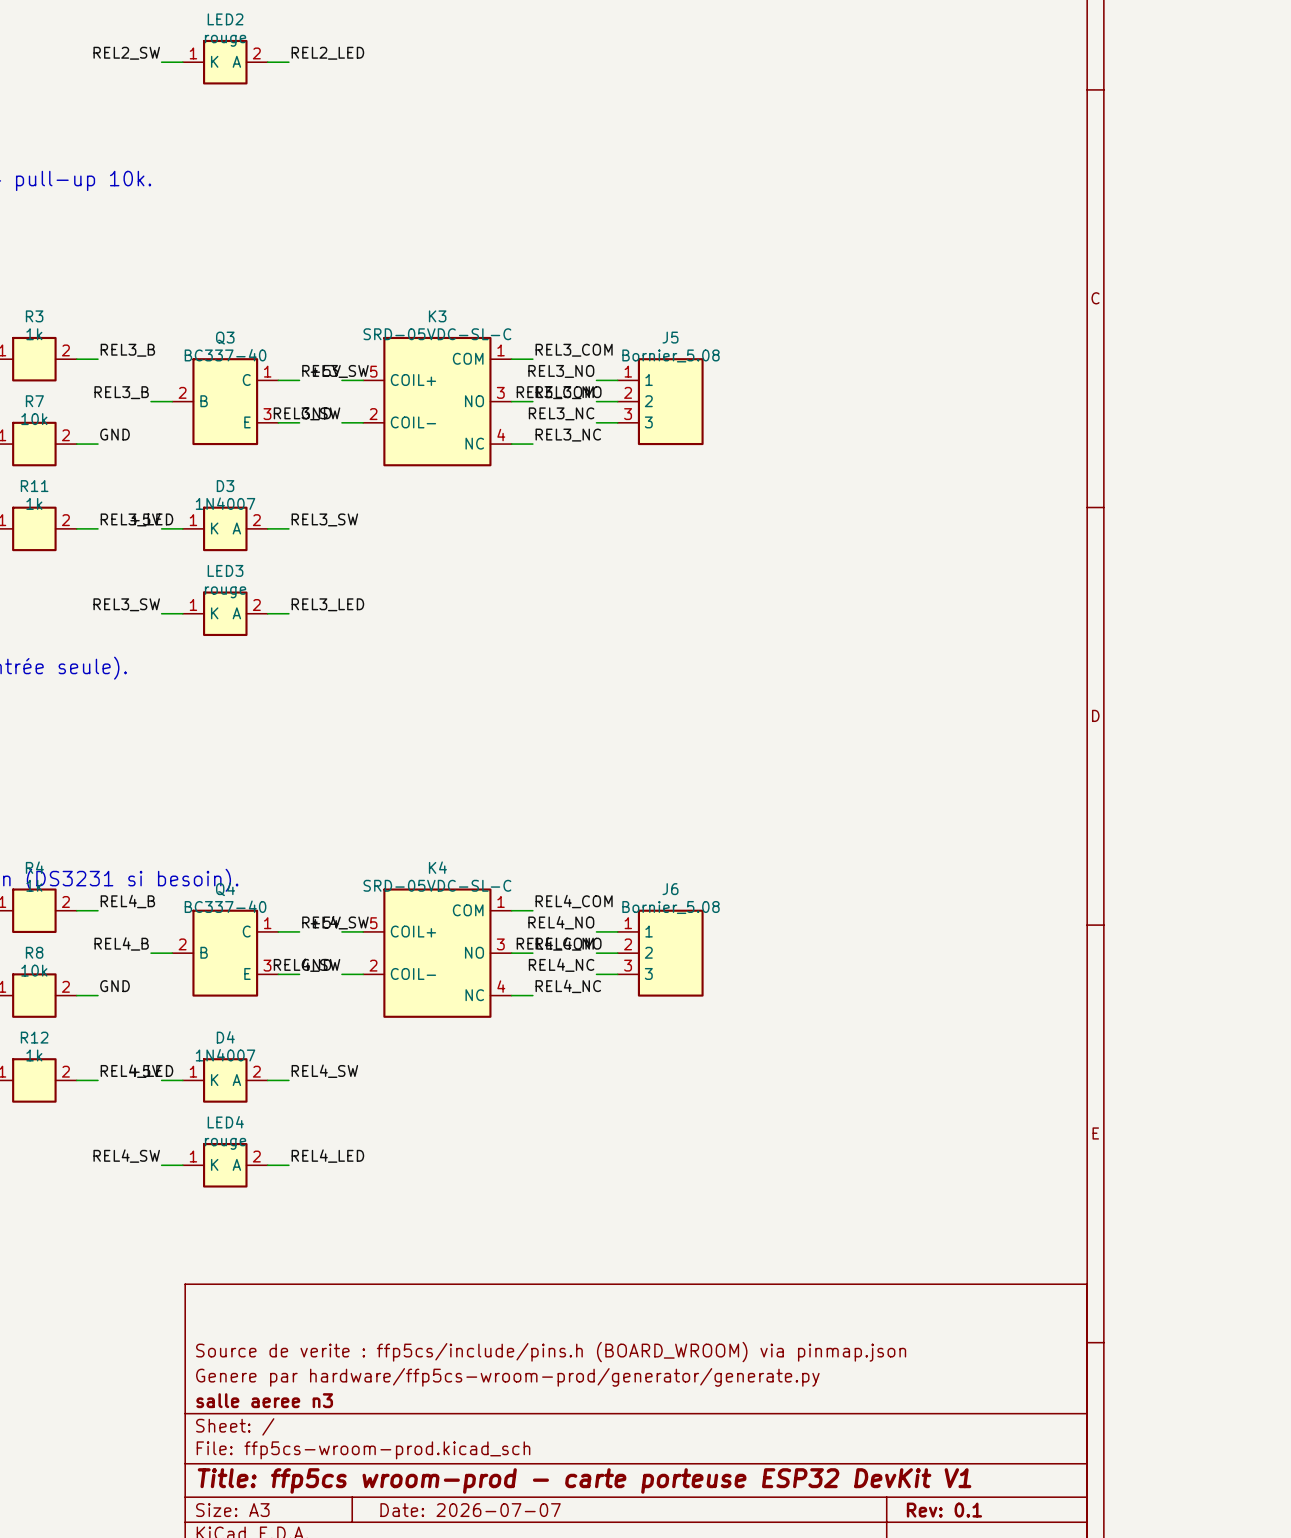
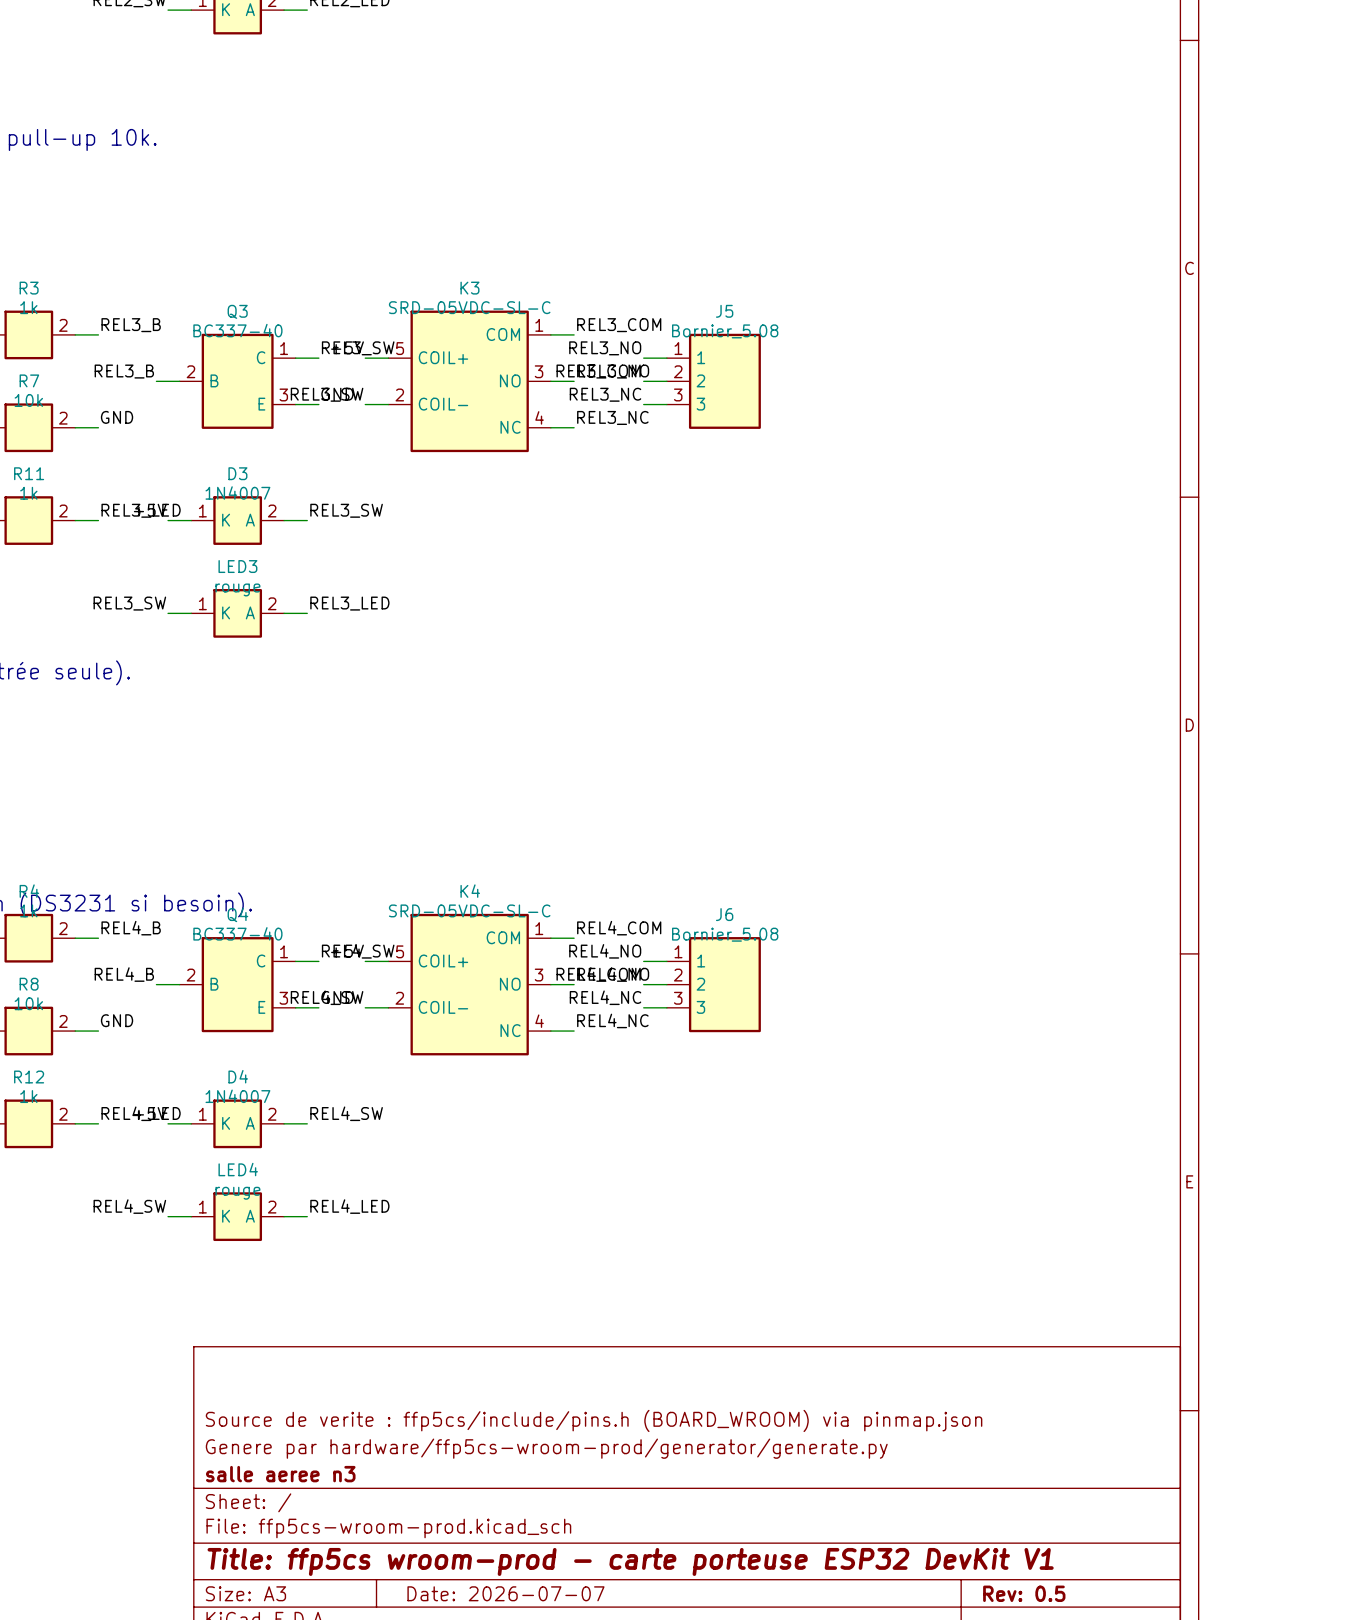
title block: Rev: 0.1 (944, 1510) -> Rev: 0.5 (1024, 1593)

